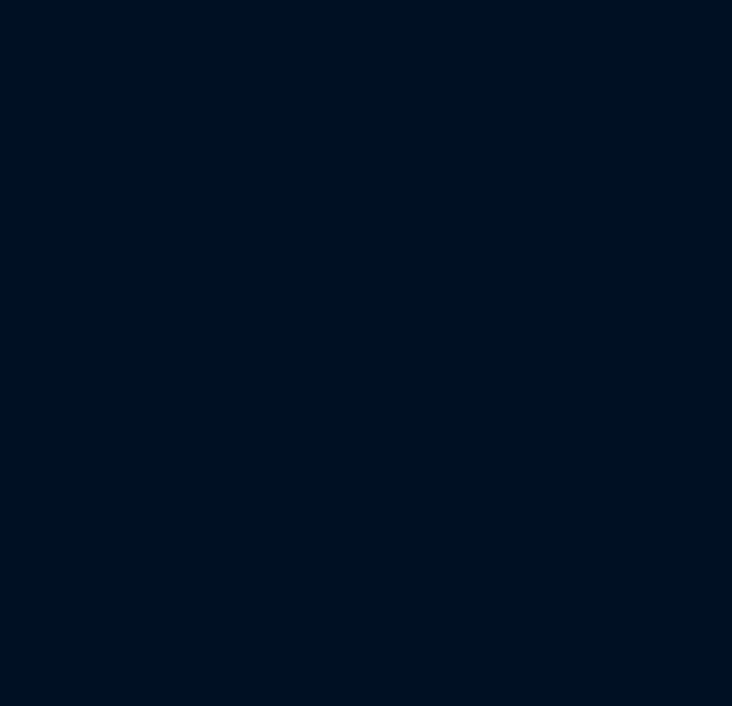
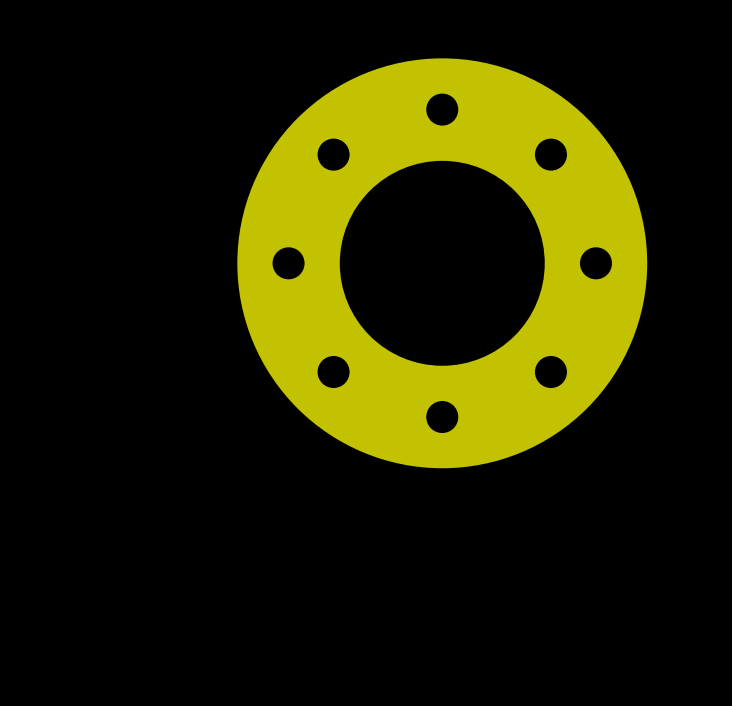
part: none -> (442, 263)

